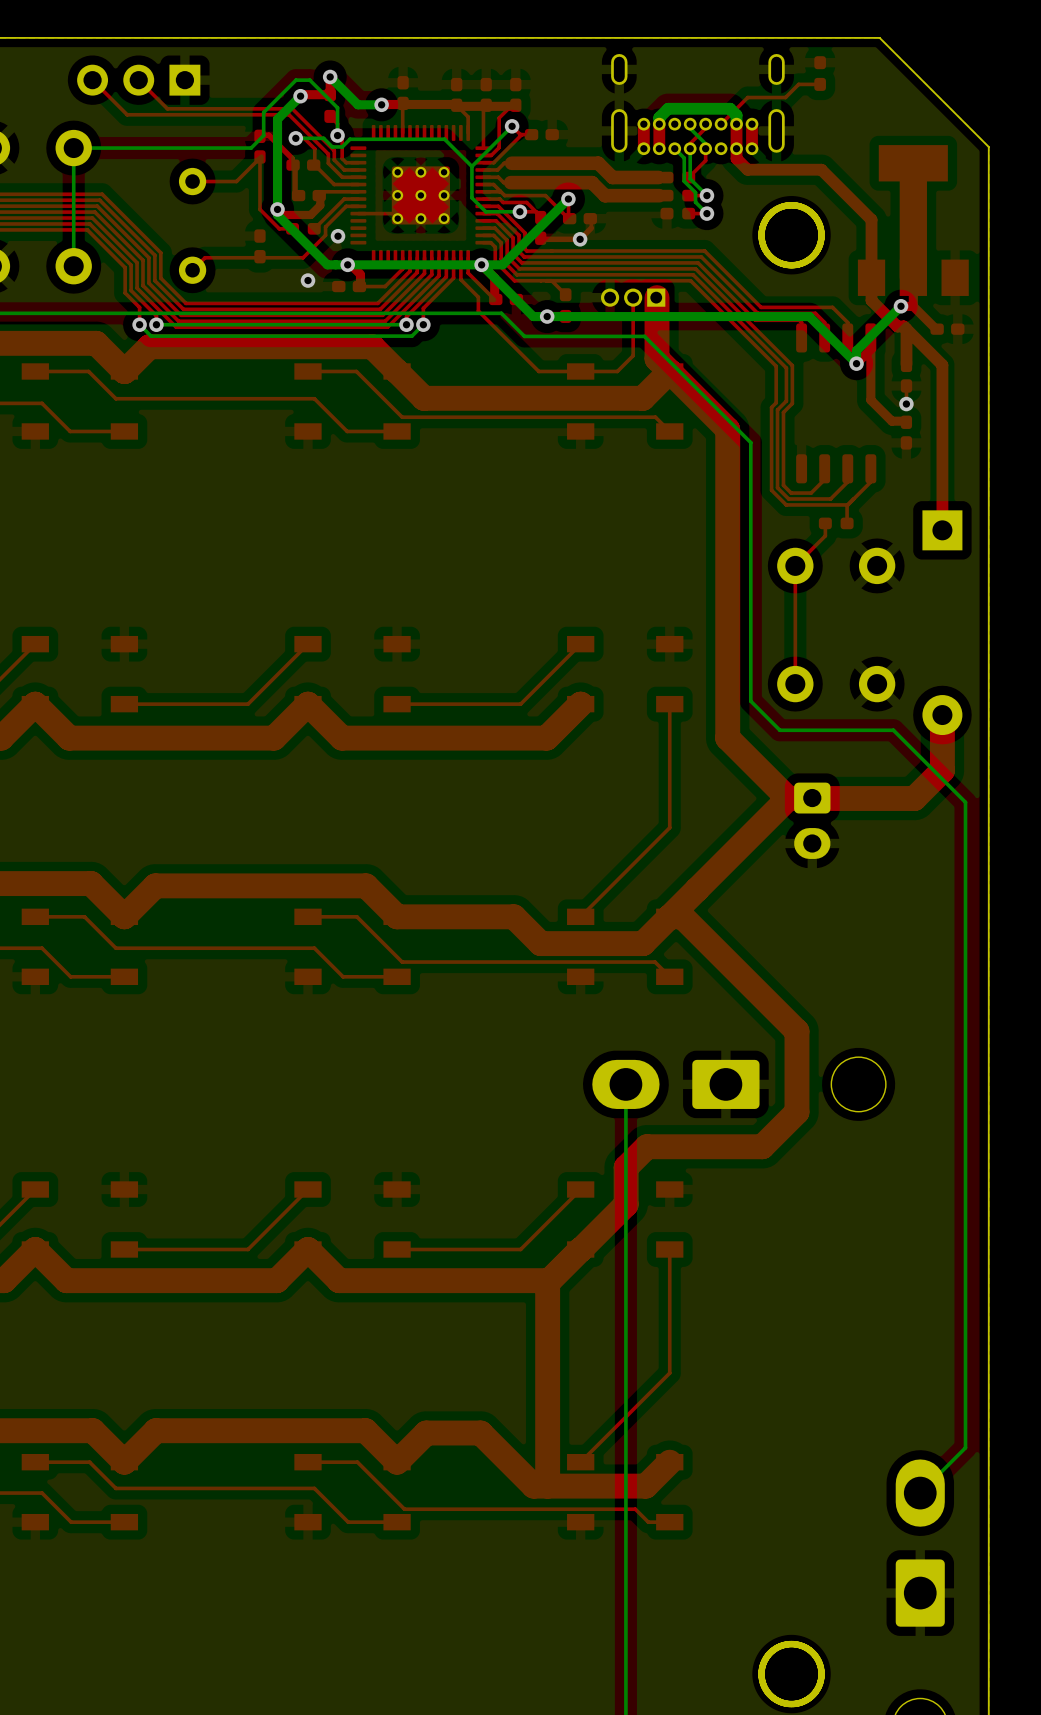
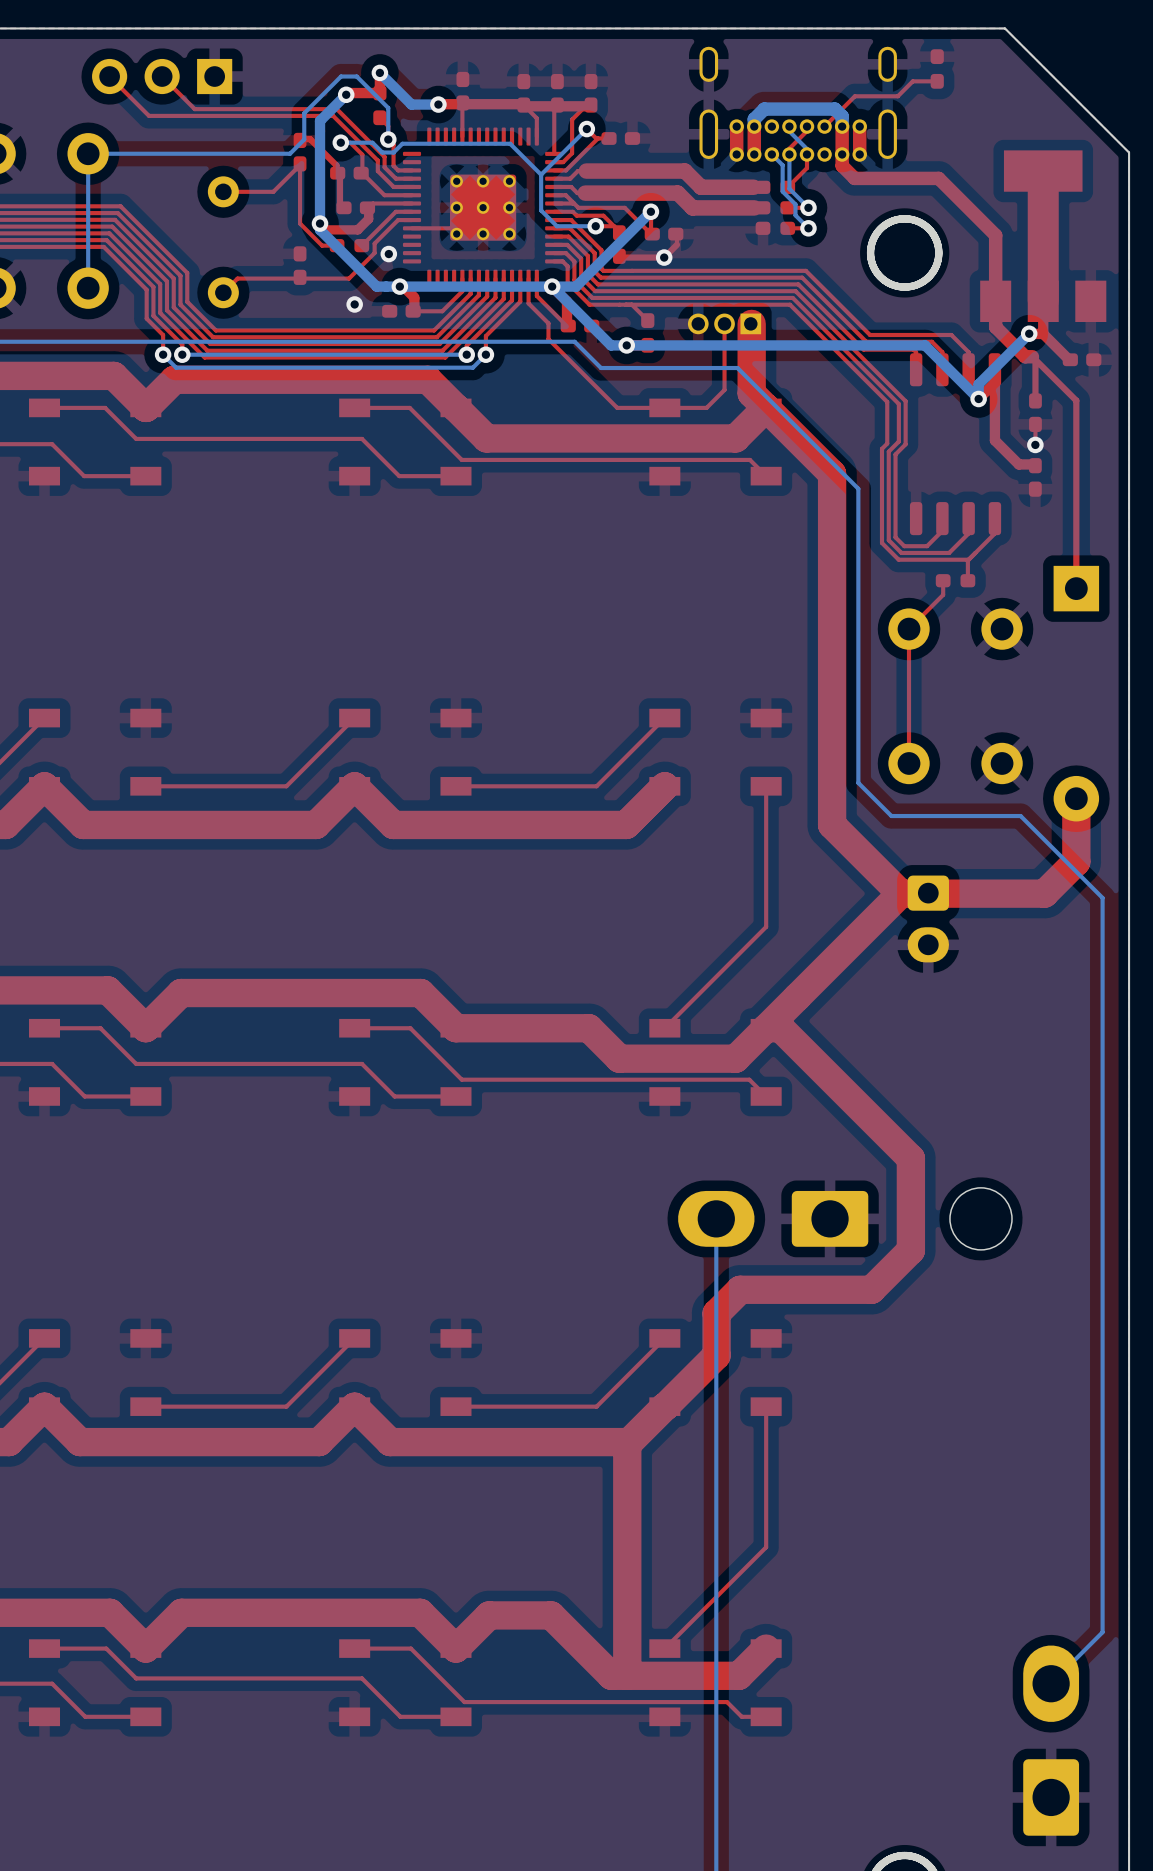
top track width: thick (903, 326) (942, 365) (942, 530) -> thin (1032, 356) (1076, 400) (1076, 588)
top track width: thick (906, 329) (906, 364) -> thin (1035, 359) (1035, 399)

